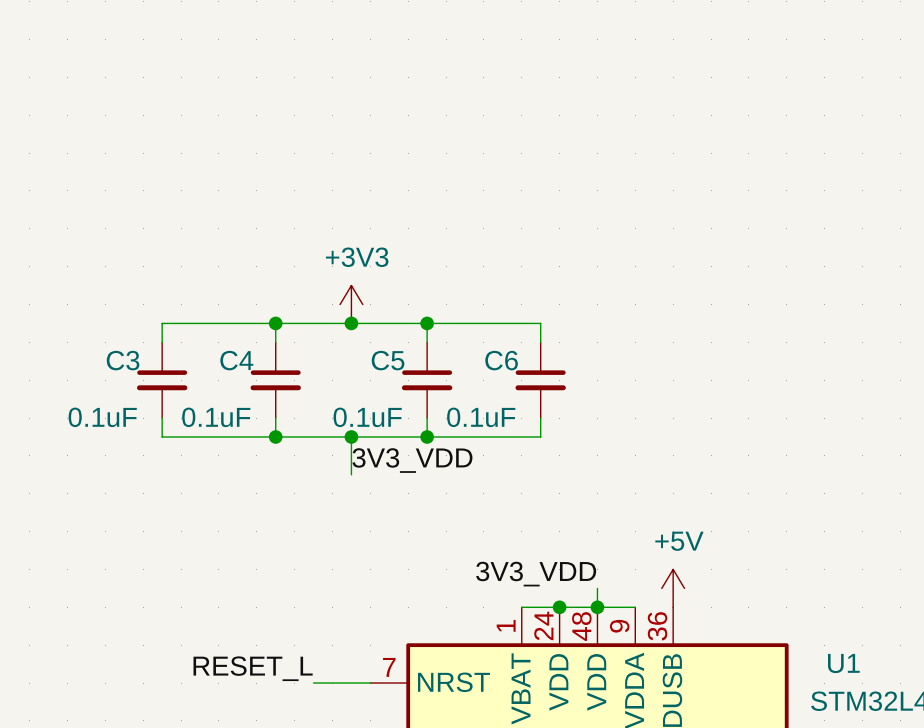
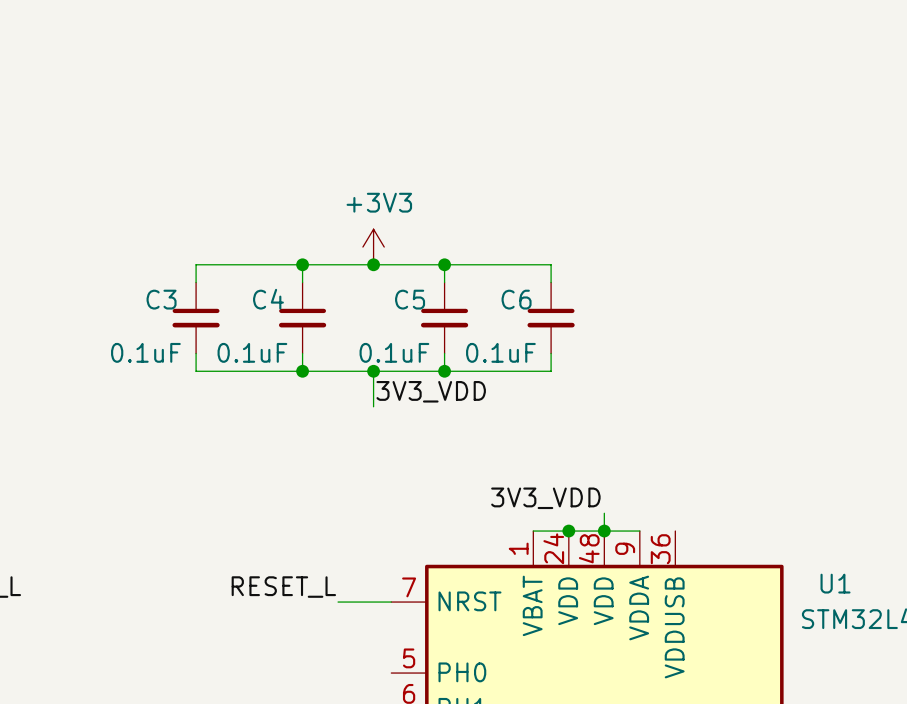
power symbol: +5V (673, 588) -> none

